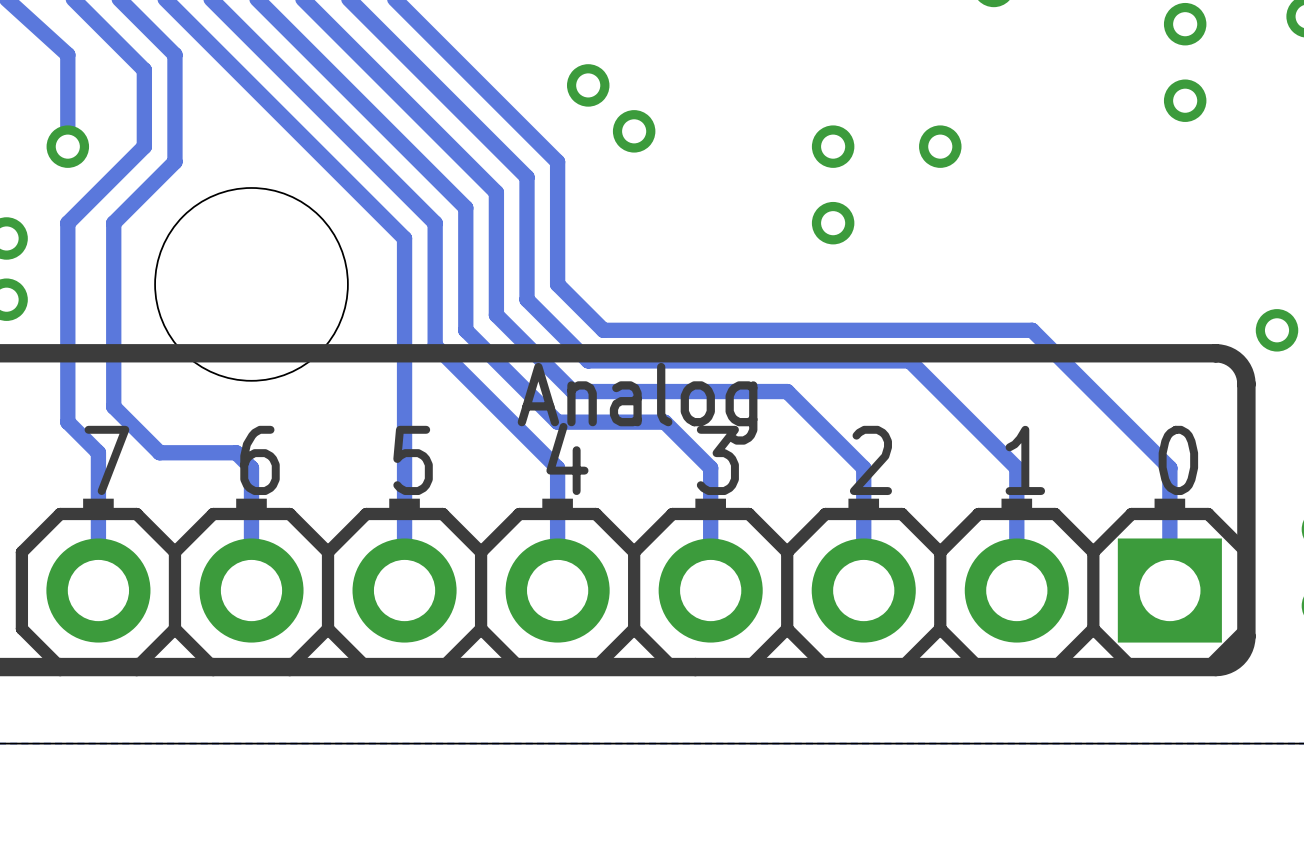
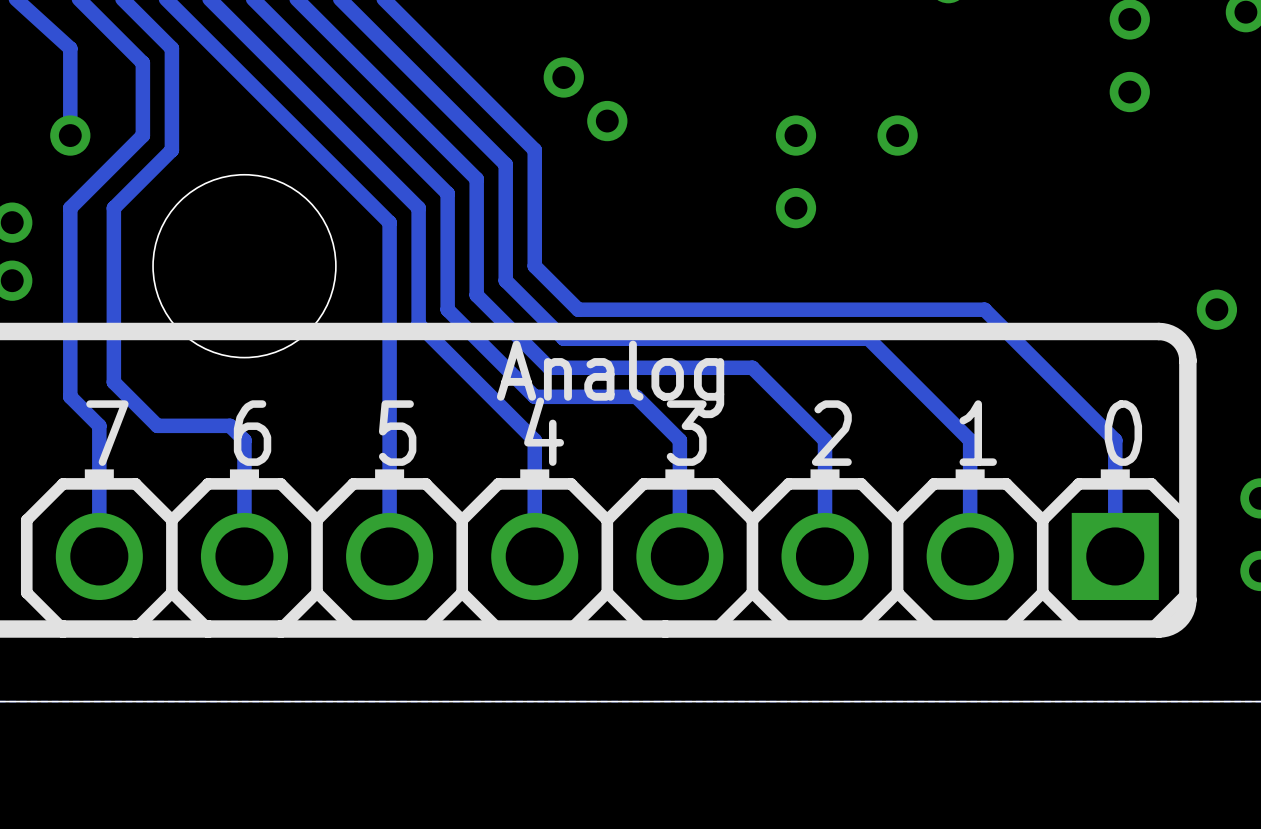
part footprint: [46, 538, 1222, 643] -> [55, 512, 1159, 600]

